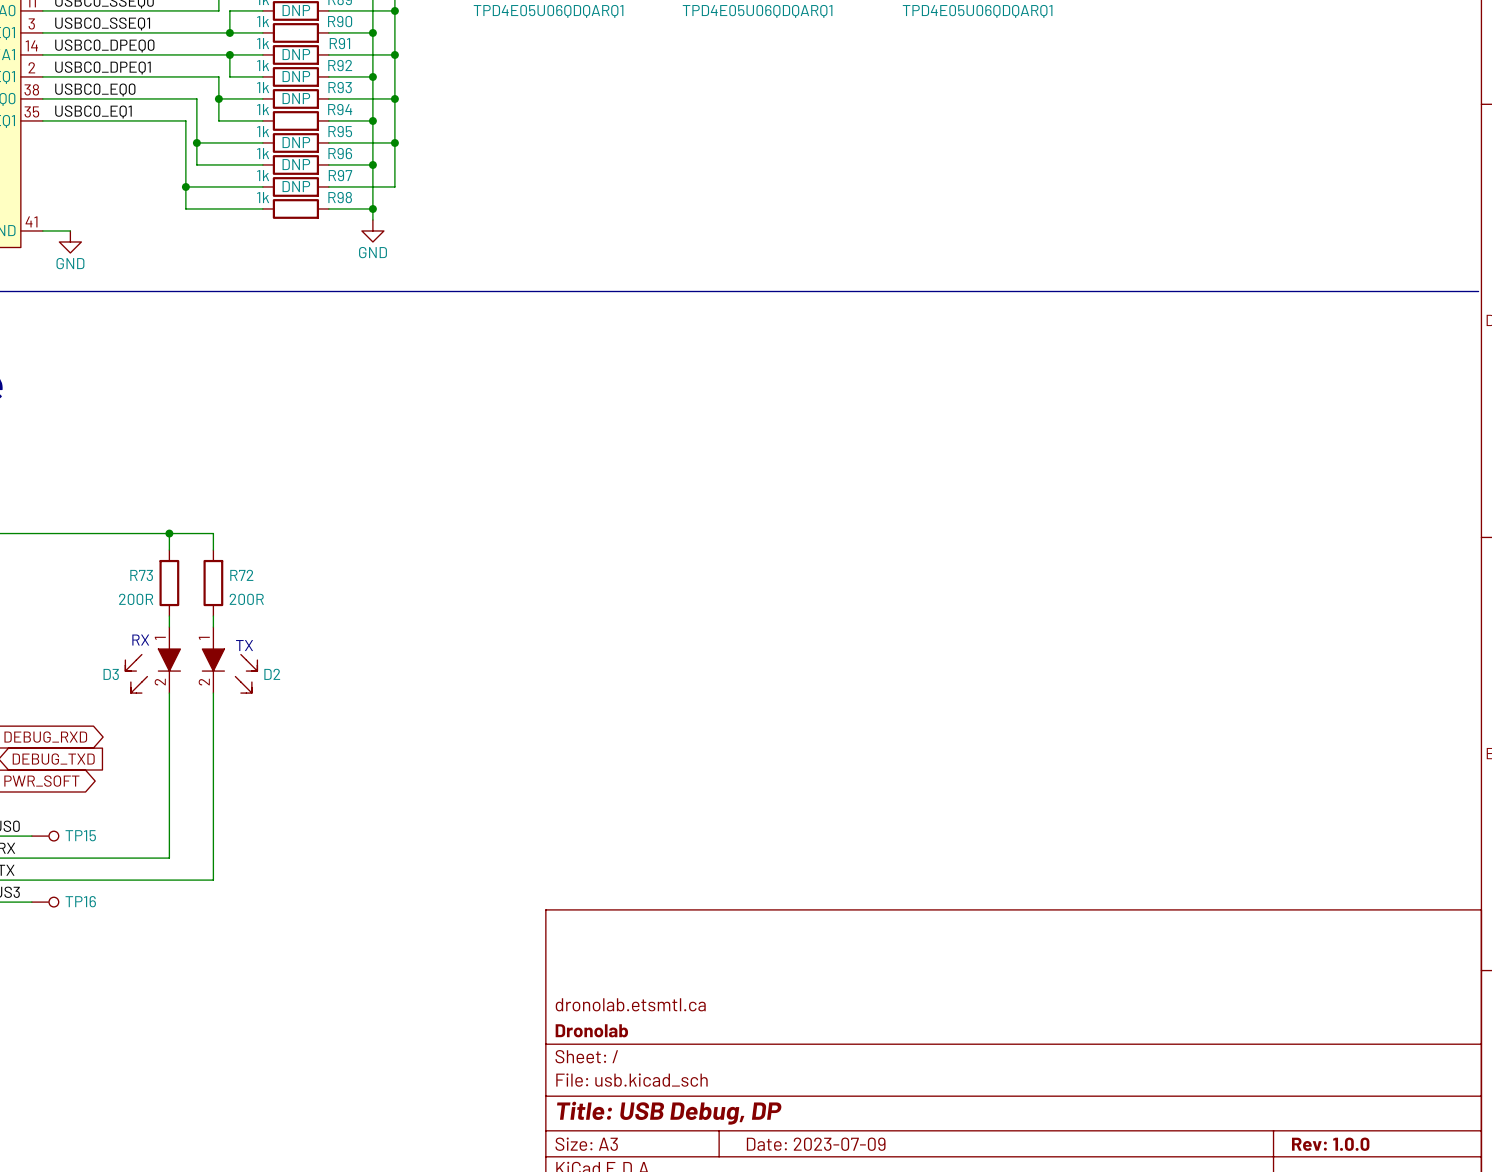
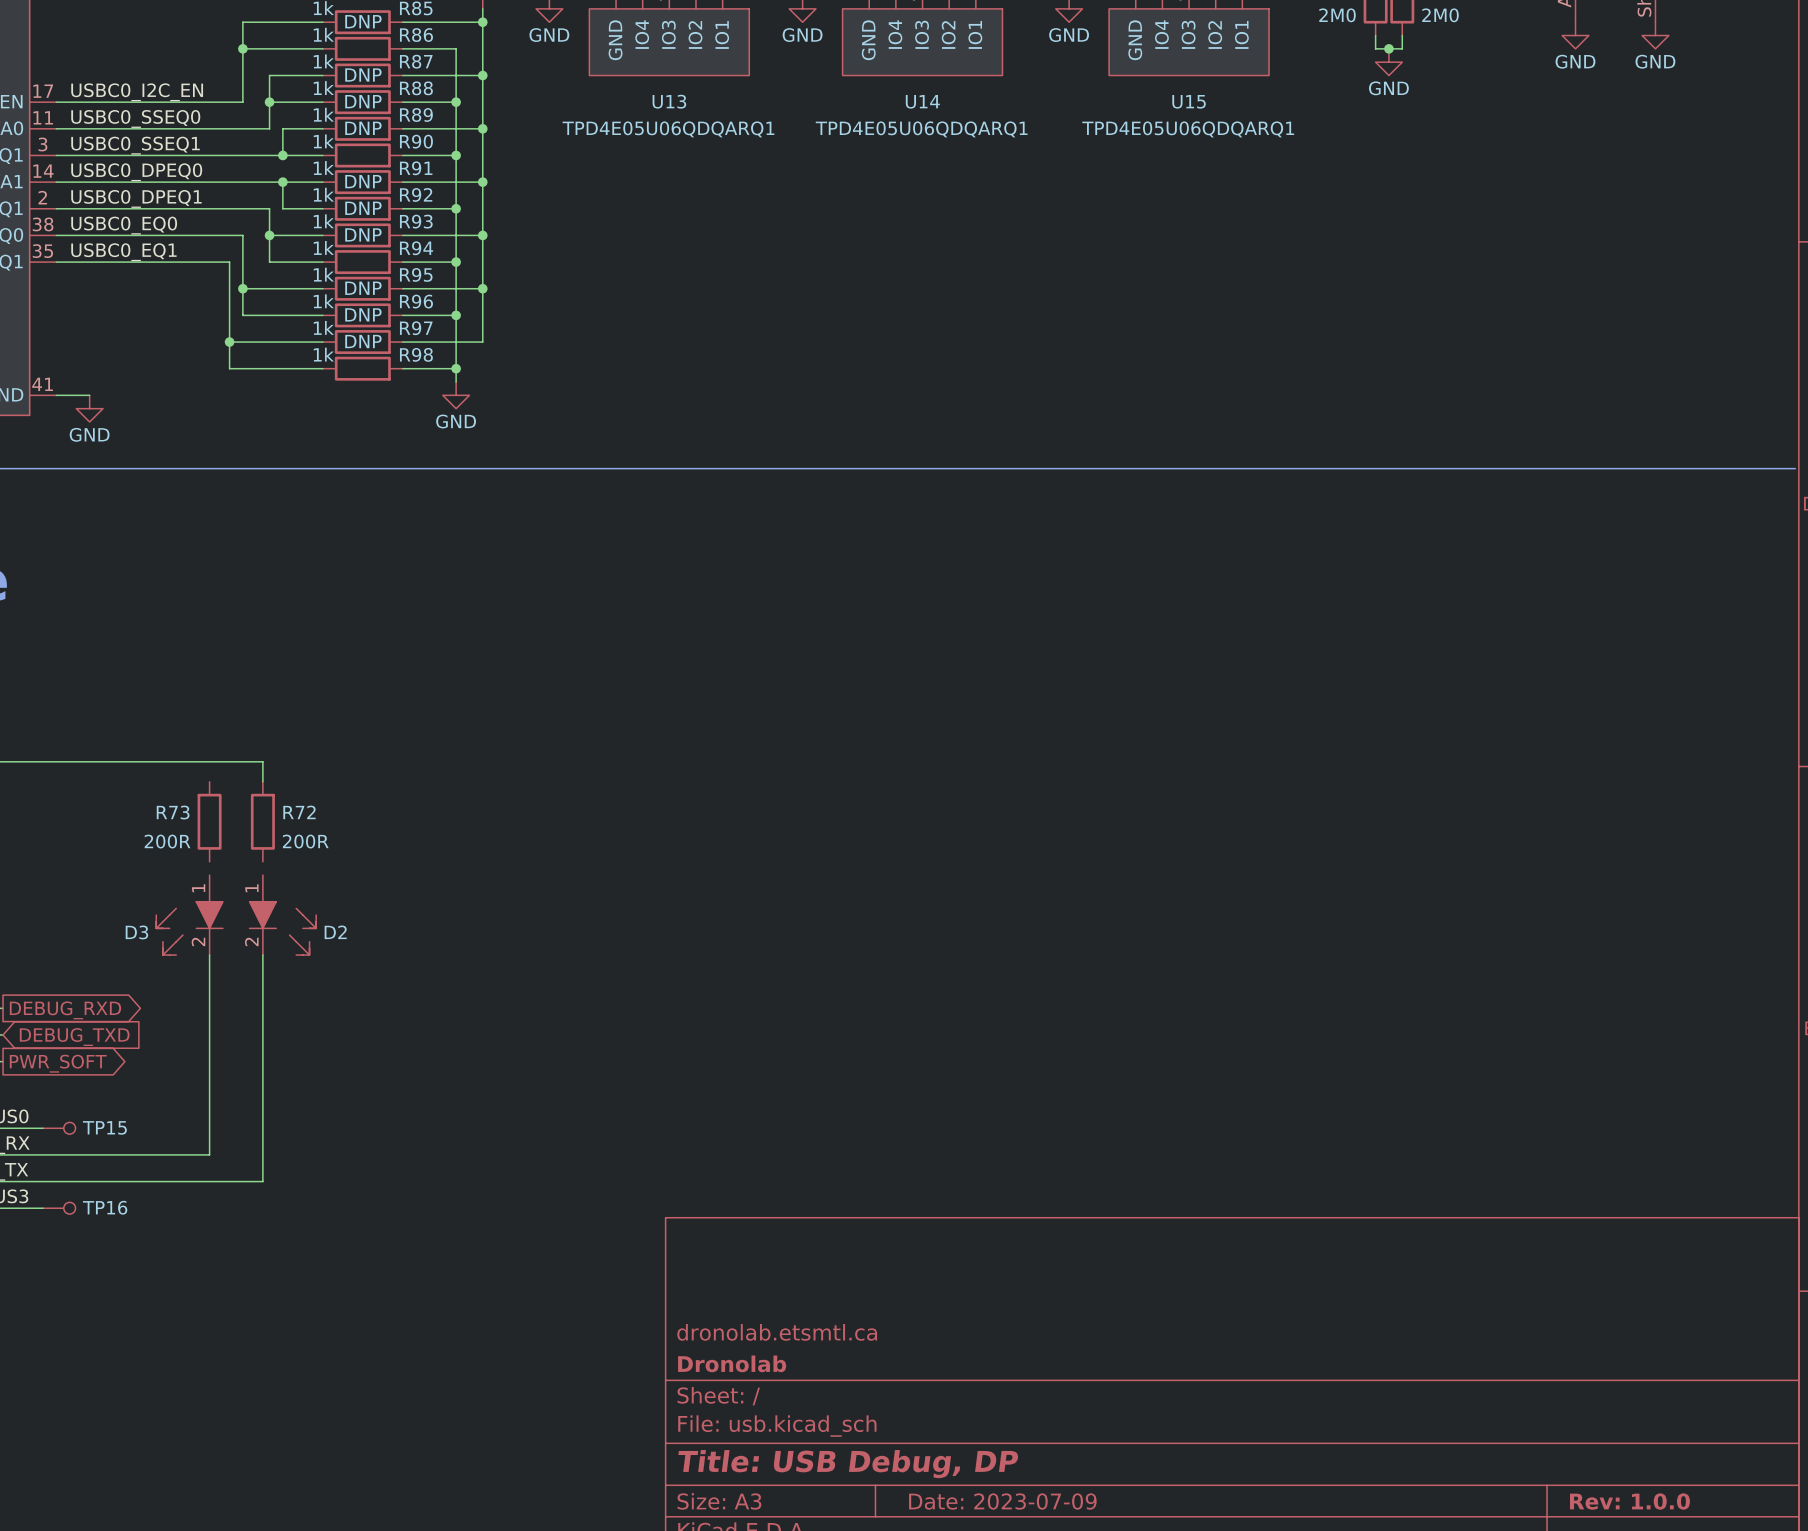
wire: (169, 533) (169, 550) -> none
junction: (169, 533) -> none
wire: (169, 616) (169, 627) -> none
wire: (213, 616) (213, 627) -> none
text: RX (140, 640) -> none
text: TX (244, 645) -> none

